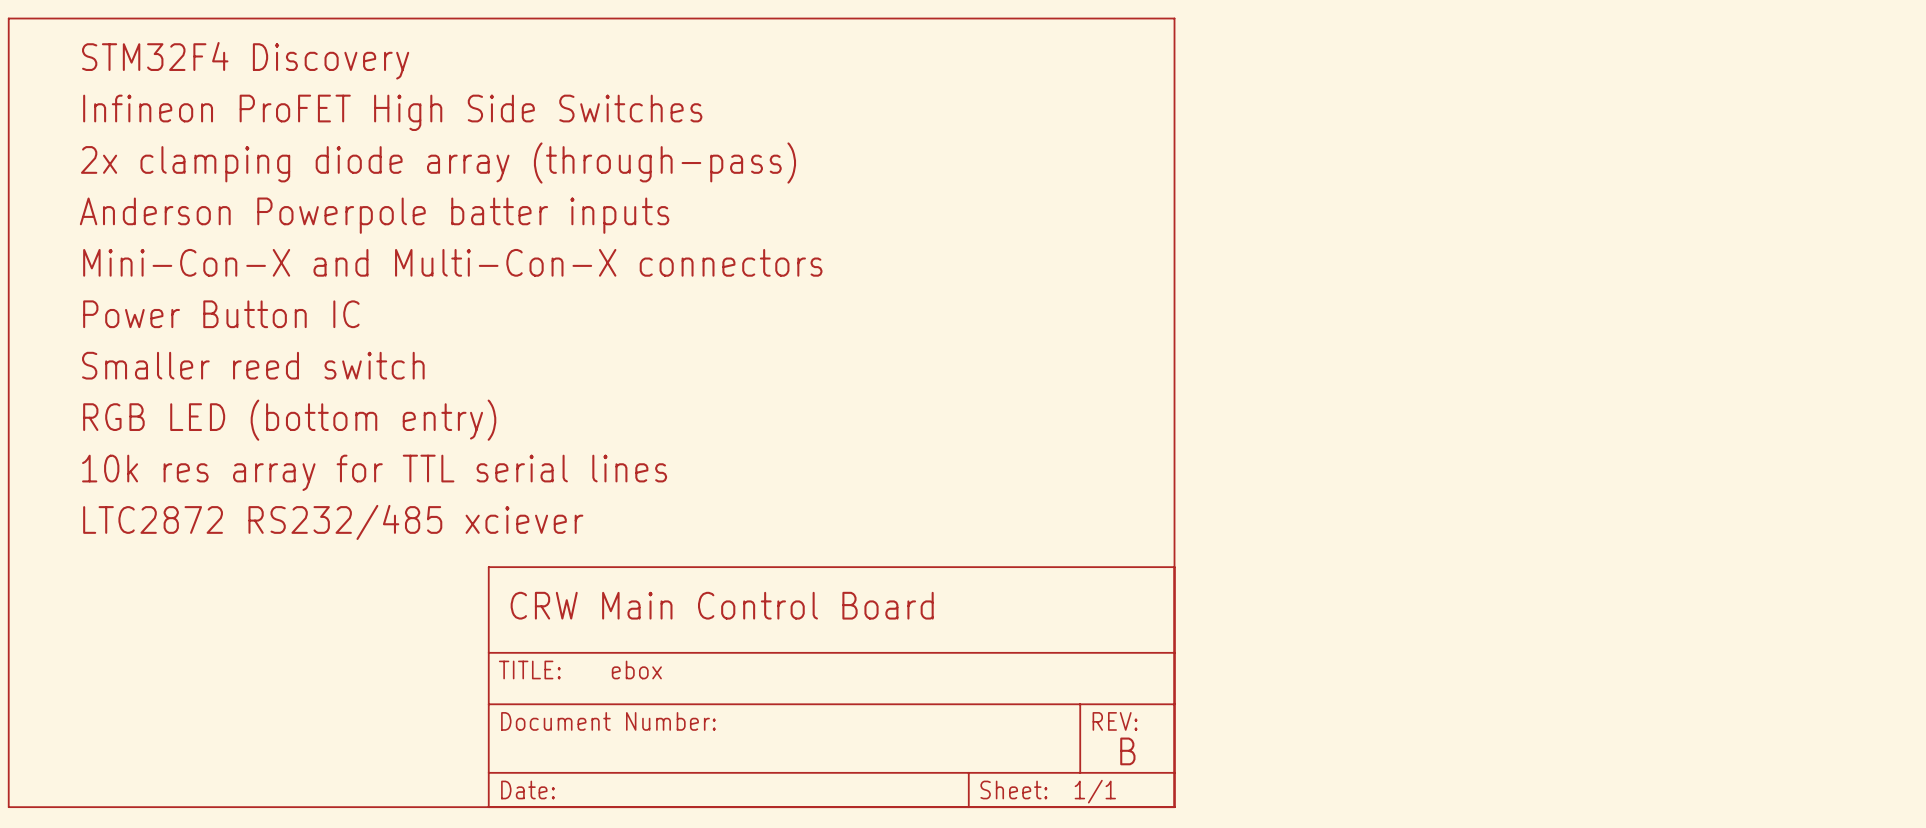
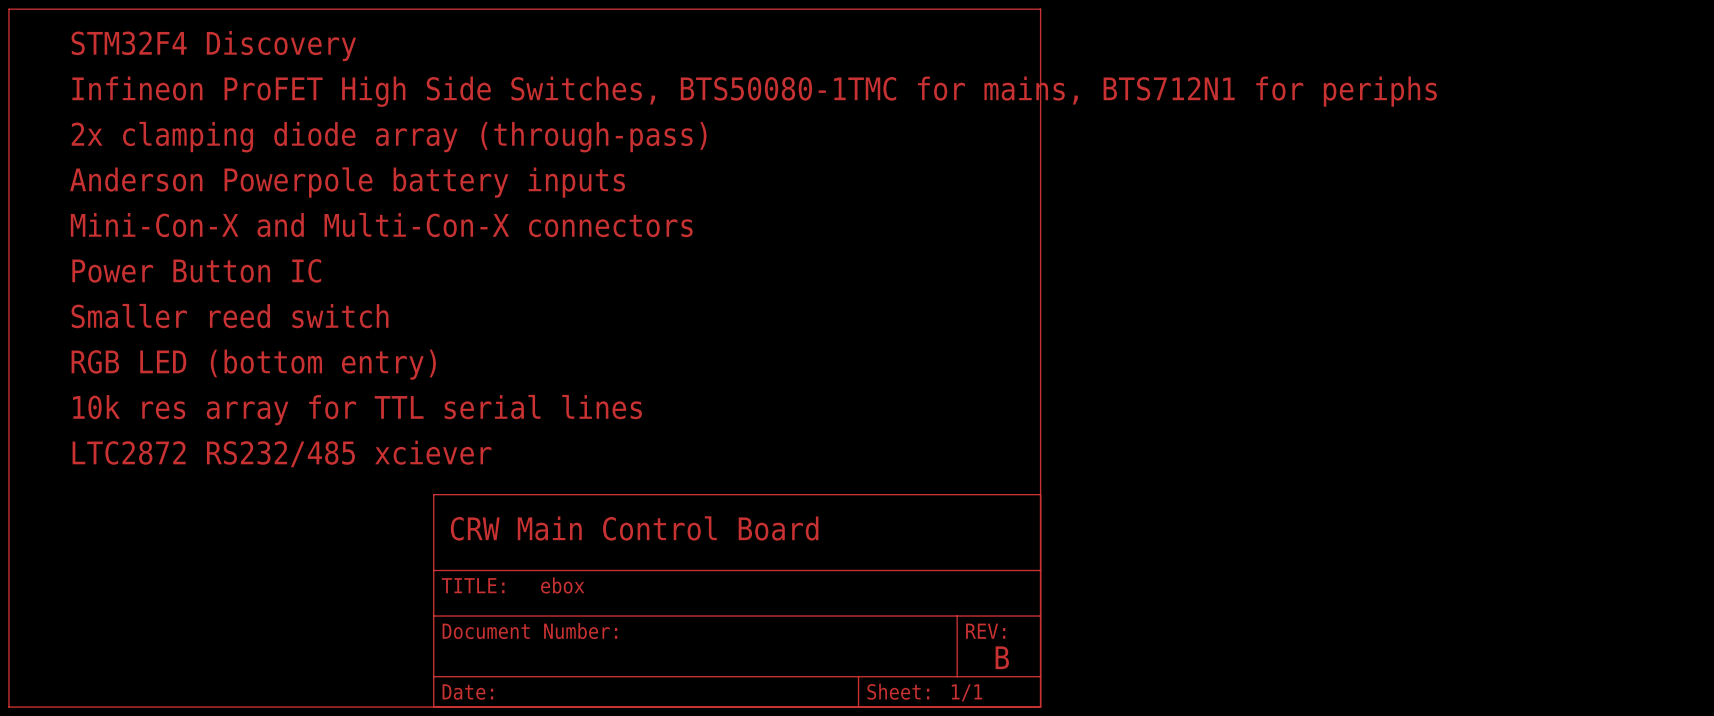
text: Infineon ProFET High Side Switches (392, 112) -> Infineon ProFET High Side Switches, BTS50080‑1TMC for mains, BTS712N1 for periphs (754, 91)
text: Anderson Powerpole batter inputs (374, 215) -> Anderson Powerpole battery inputs (347, 182)

